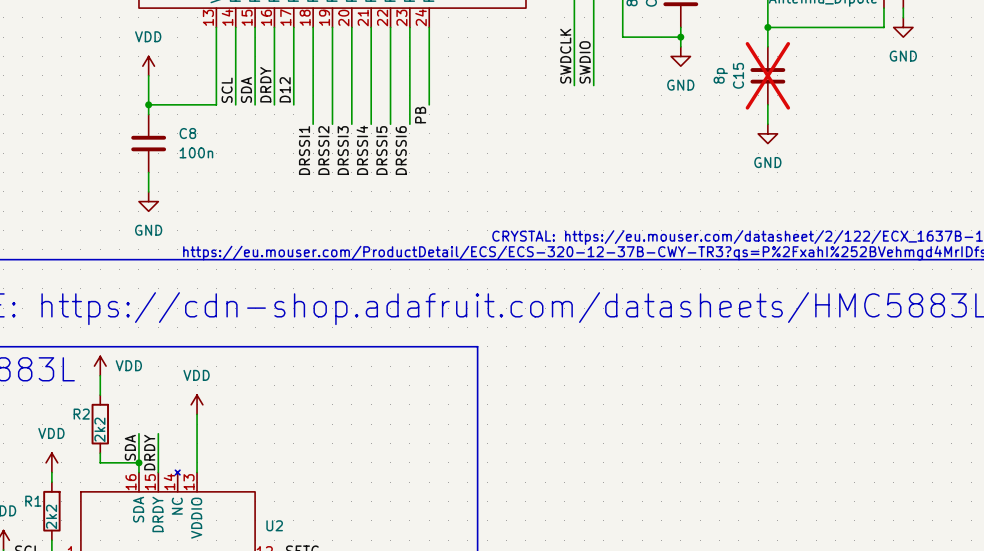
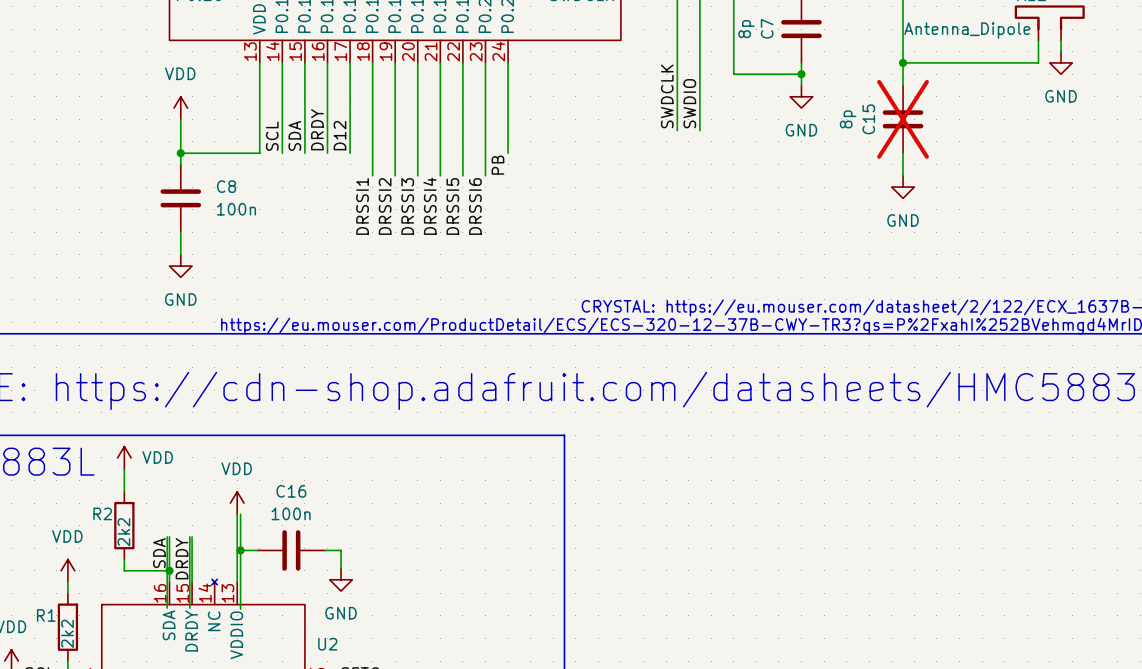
wire: none -> (240, 514) (240, 609)
wire: none -> (167, 536) (167, 608)
wire: none -> (189, 536) (189, 608)
wire: none -> (240, 550) (257, 550)
junction: none -> (240, 550)
C16: none -> 100n (291, 550)
wire: none -> (325, 550) (341, 550) (341, 568)
power symbol: none -> GND (341, 579)

